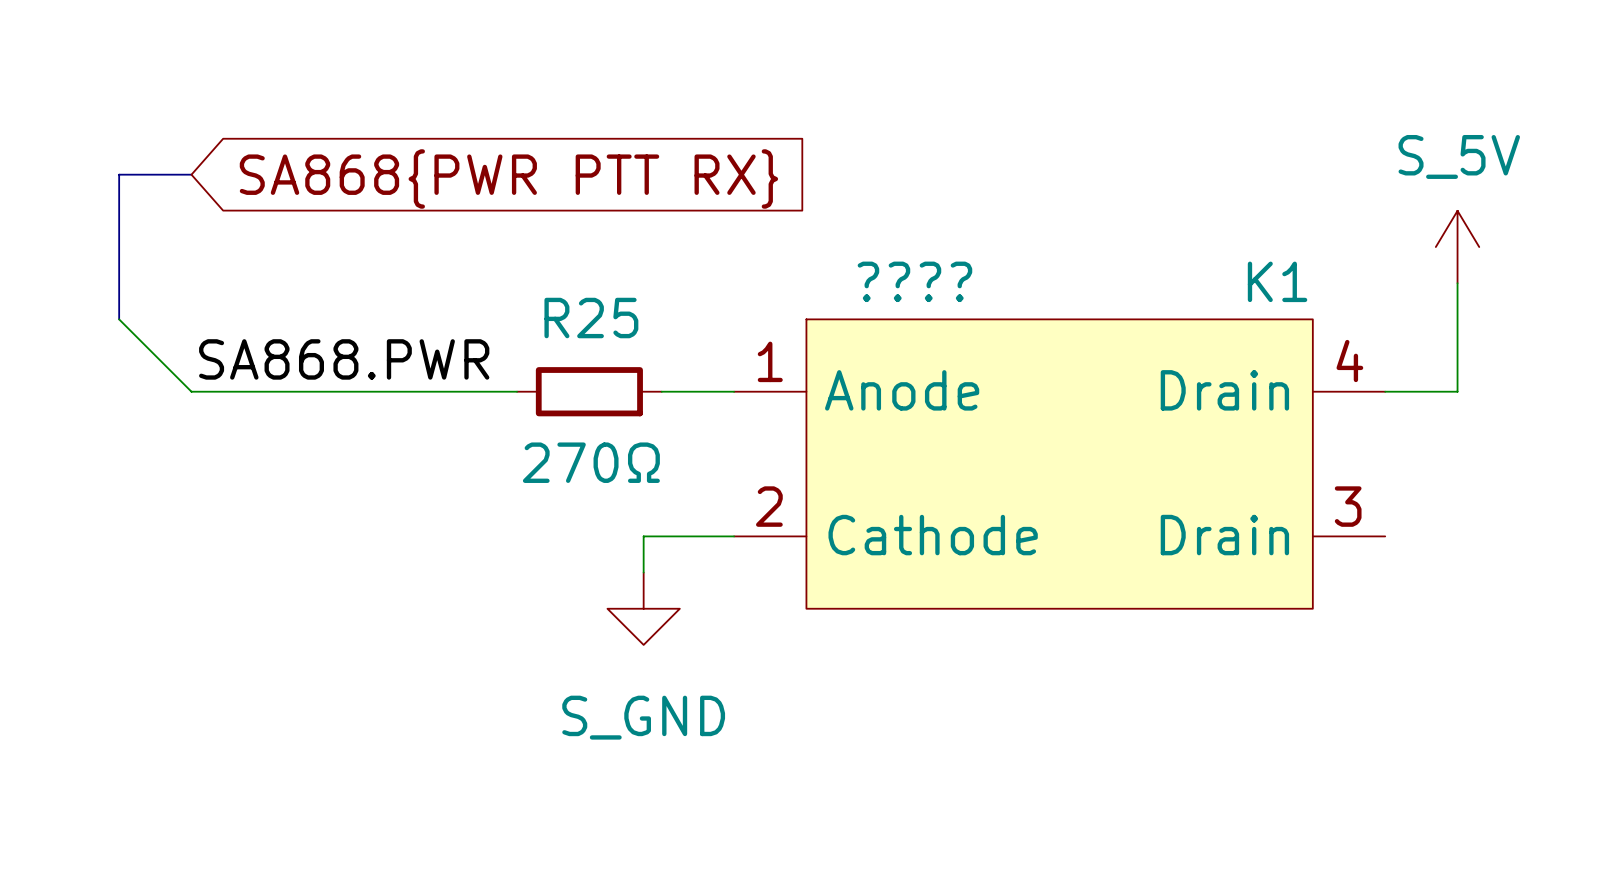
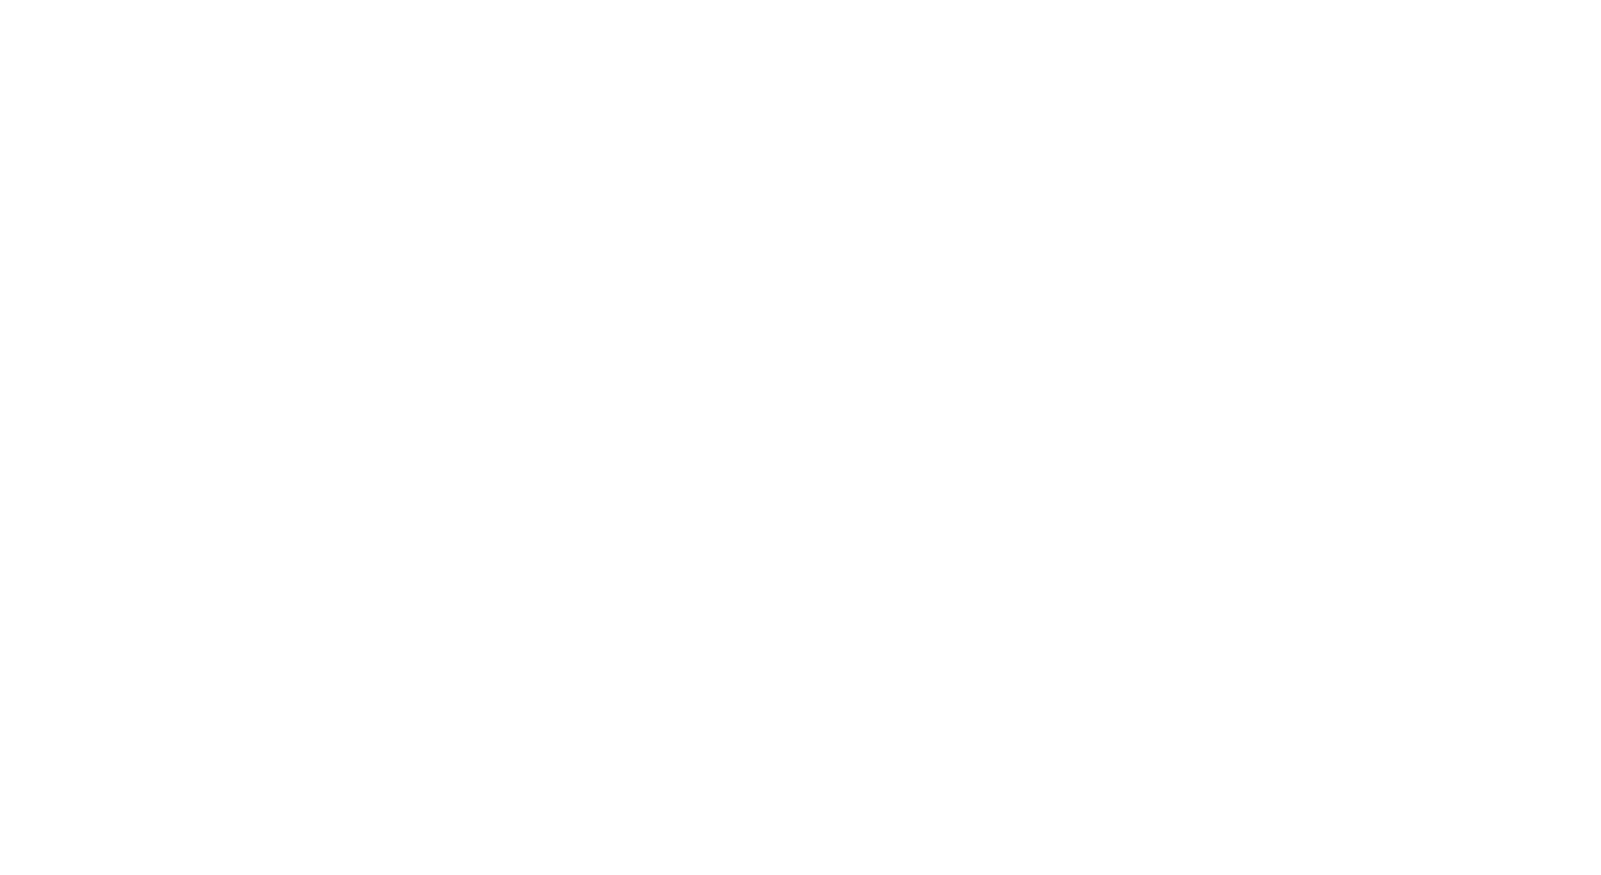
bus: (191, 174) (119, 174) (119, 319) -> none
global label: SA868{PWR PTT RX} (508, 178) -> none
power symbol: S_5V (1457, 247) -> none
wire: (1457, 283) (1457, 391) (1385, 391) -> none
wire: (119, 319) (191, 391) (517, 391) -> none
label: SA868.PWR (344, 359) -> none
R25: 270Ω (589, 391) -> none
wire: (661, 391) (734, 391) -> none
K1: ???? (1059, 464) -> none
wire: (734, 536) (643, 536) (643, 572) -> none
power symbol: S_GND (643, 608) -> none

